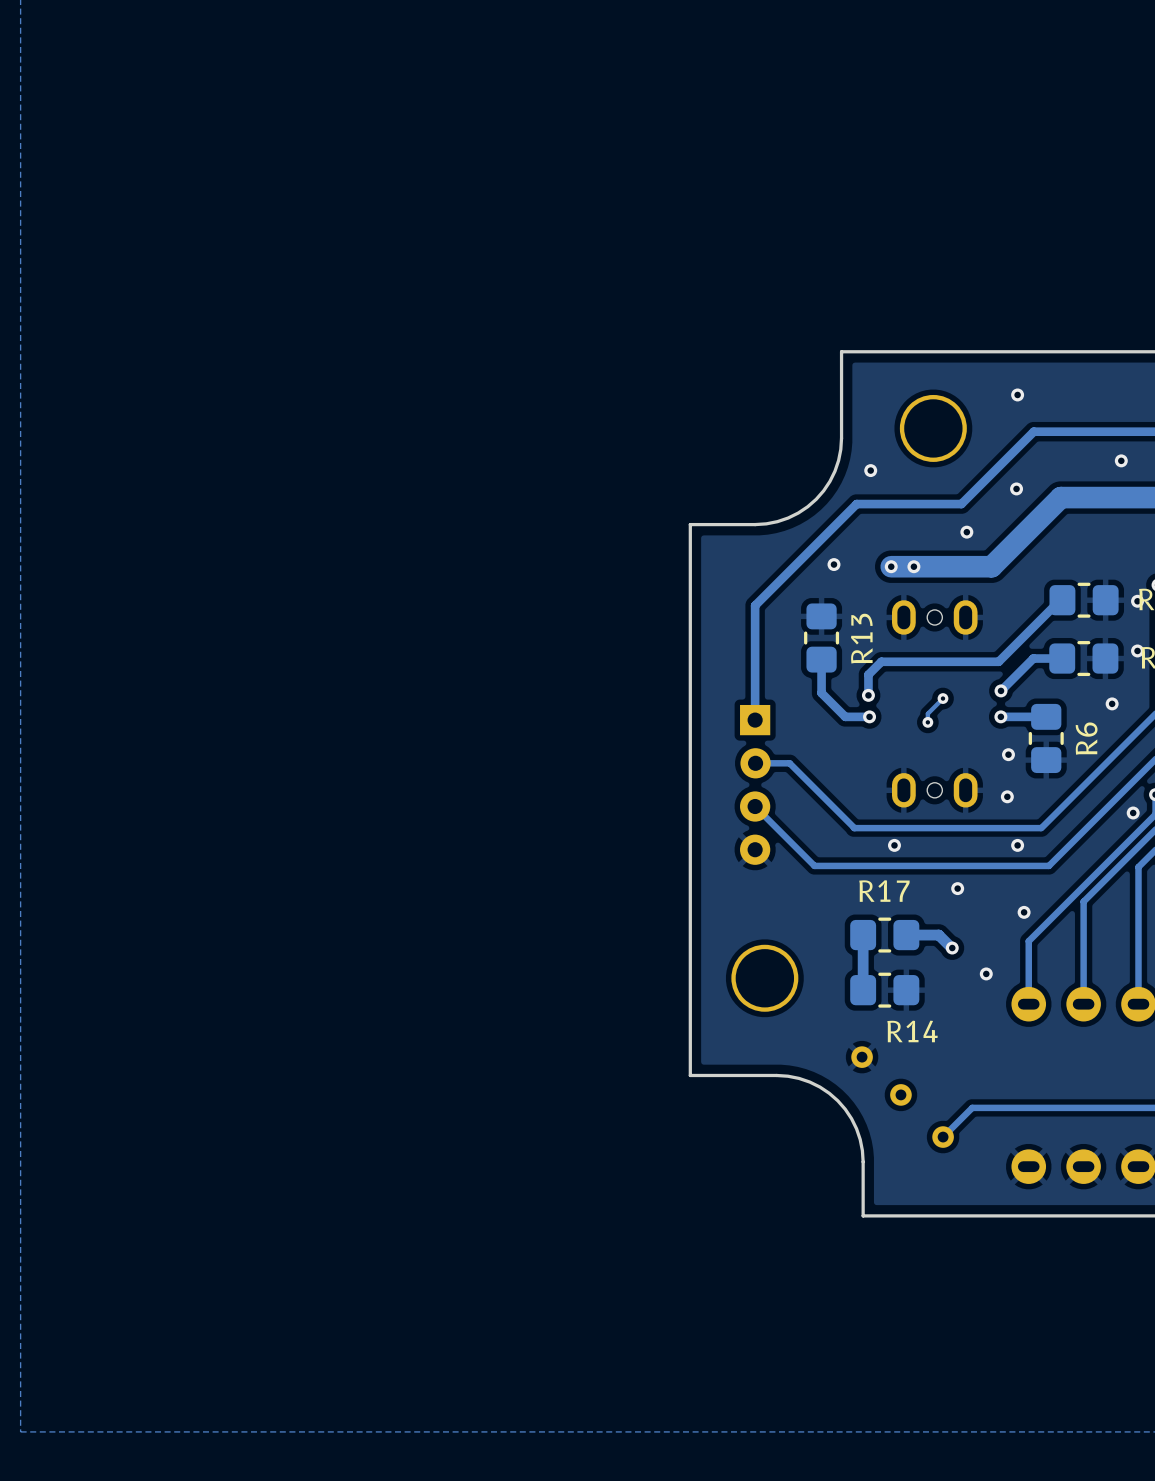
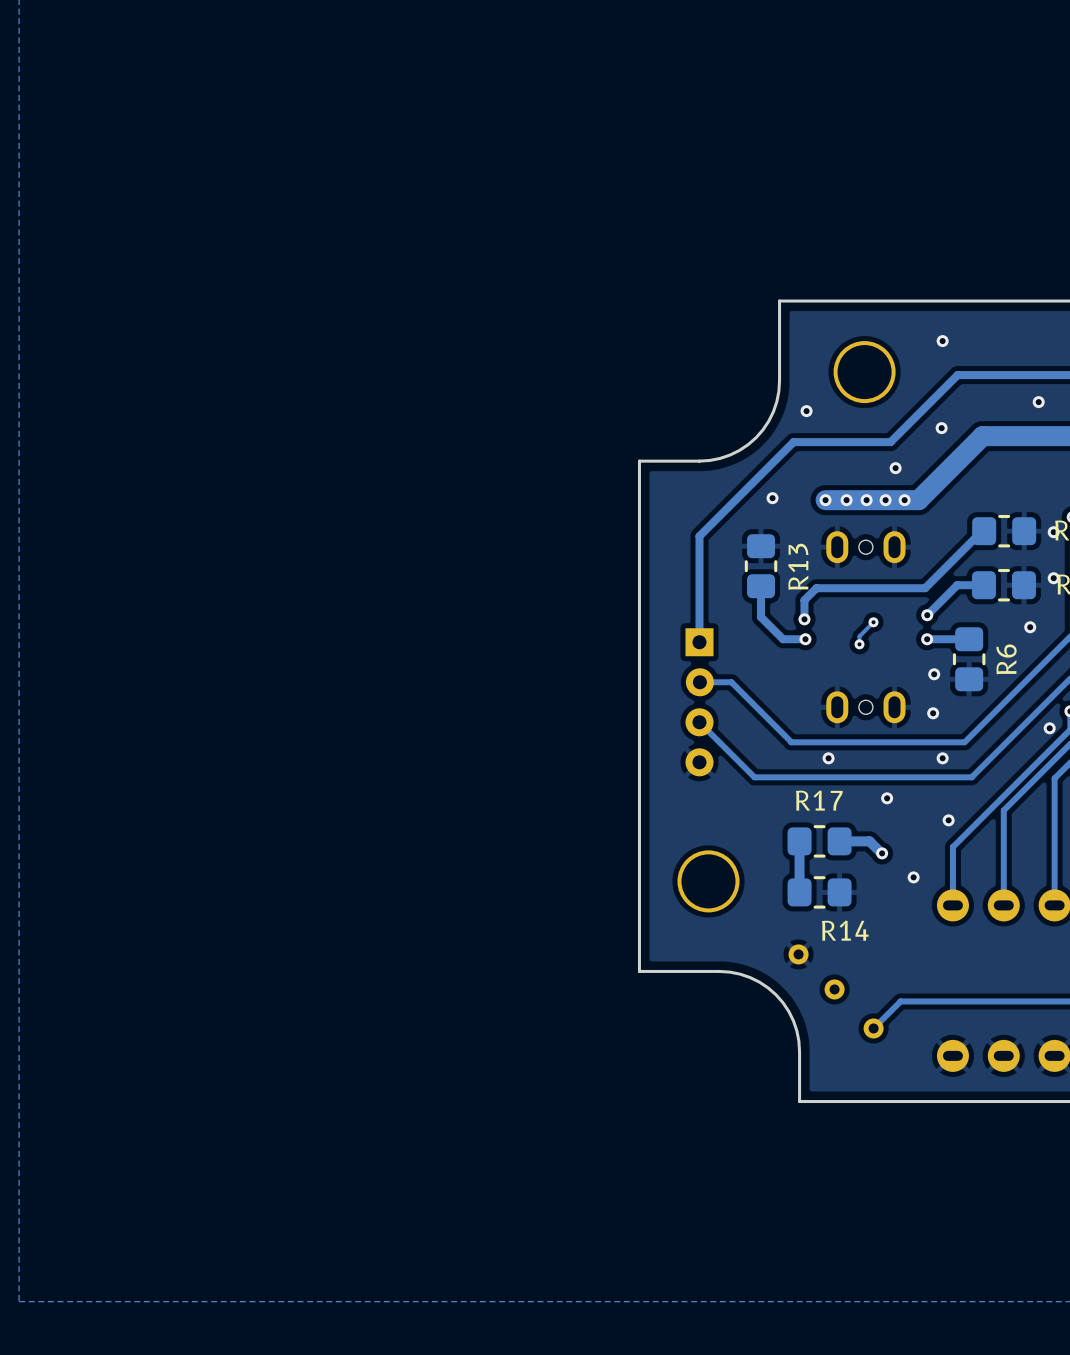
via: none -> (866, 500)
via: none -> (885, 500)
via: none -> (904, 500)

